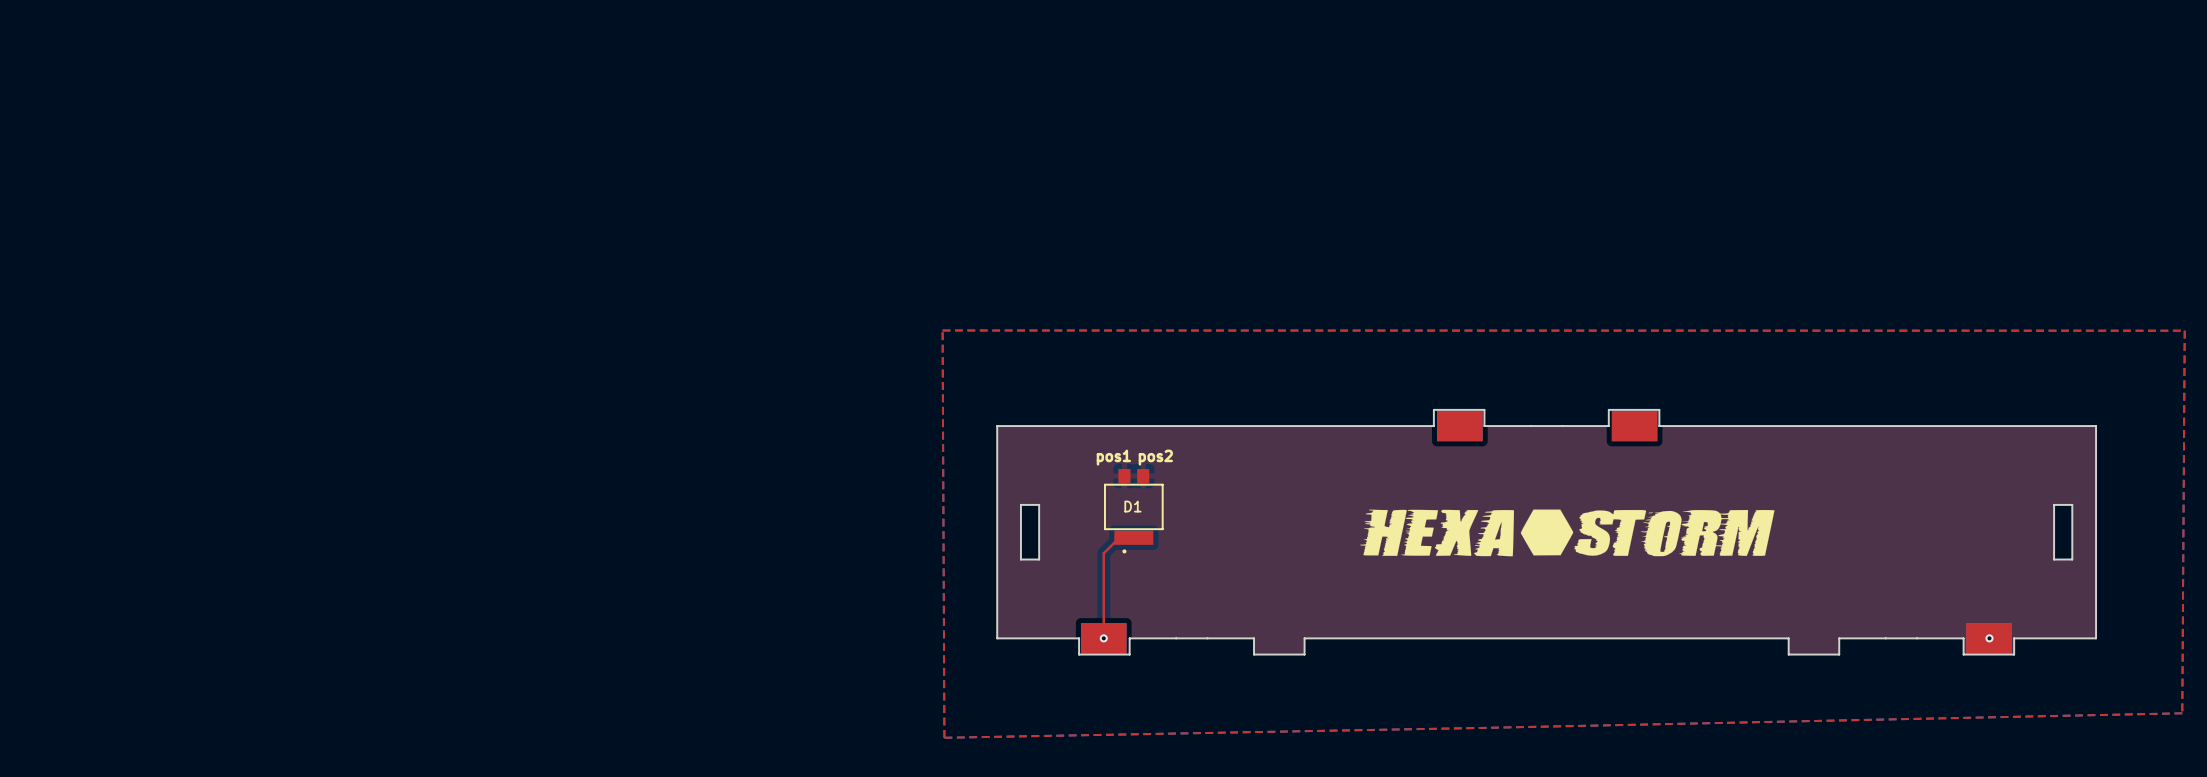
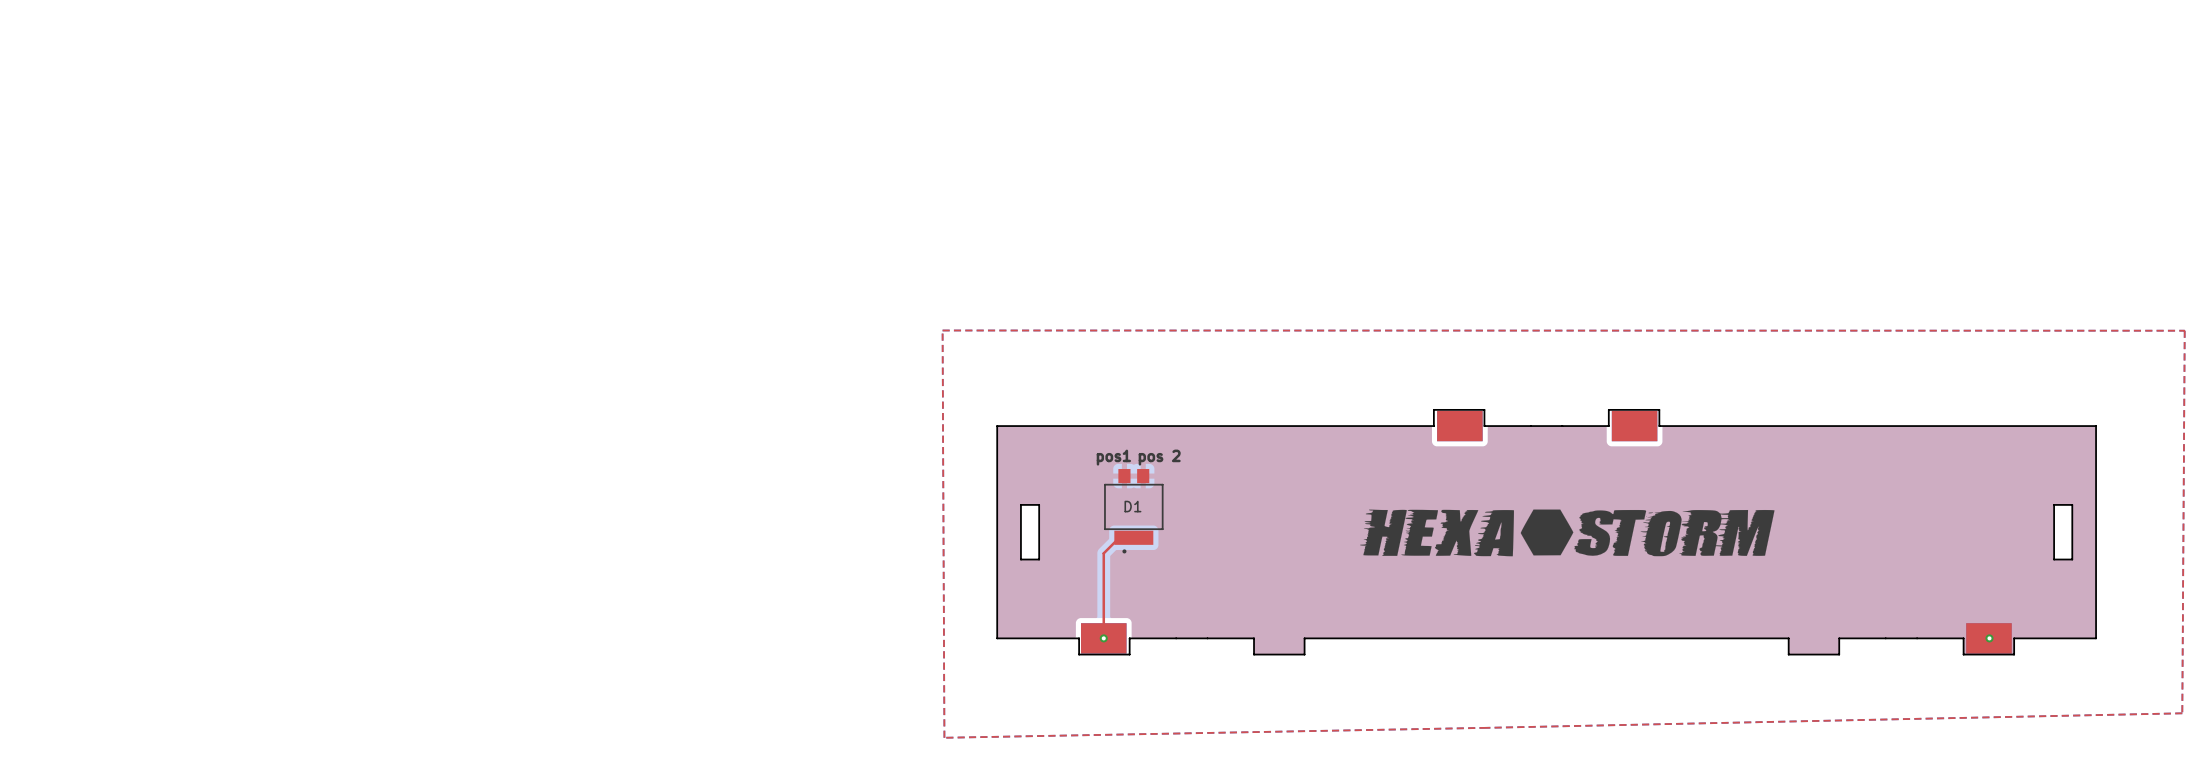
text: pos2 (1155, 457) -> pos 2 (1159, 457)

